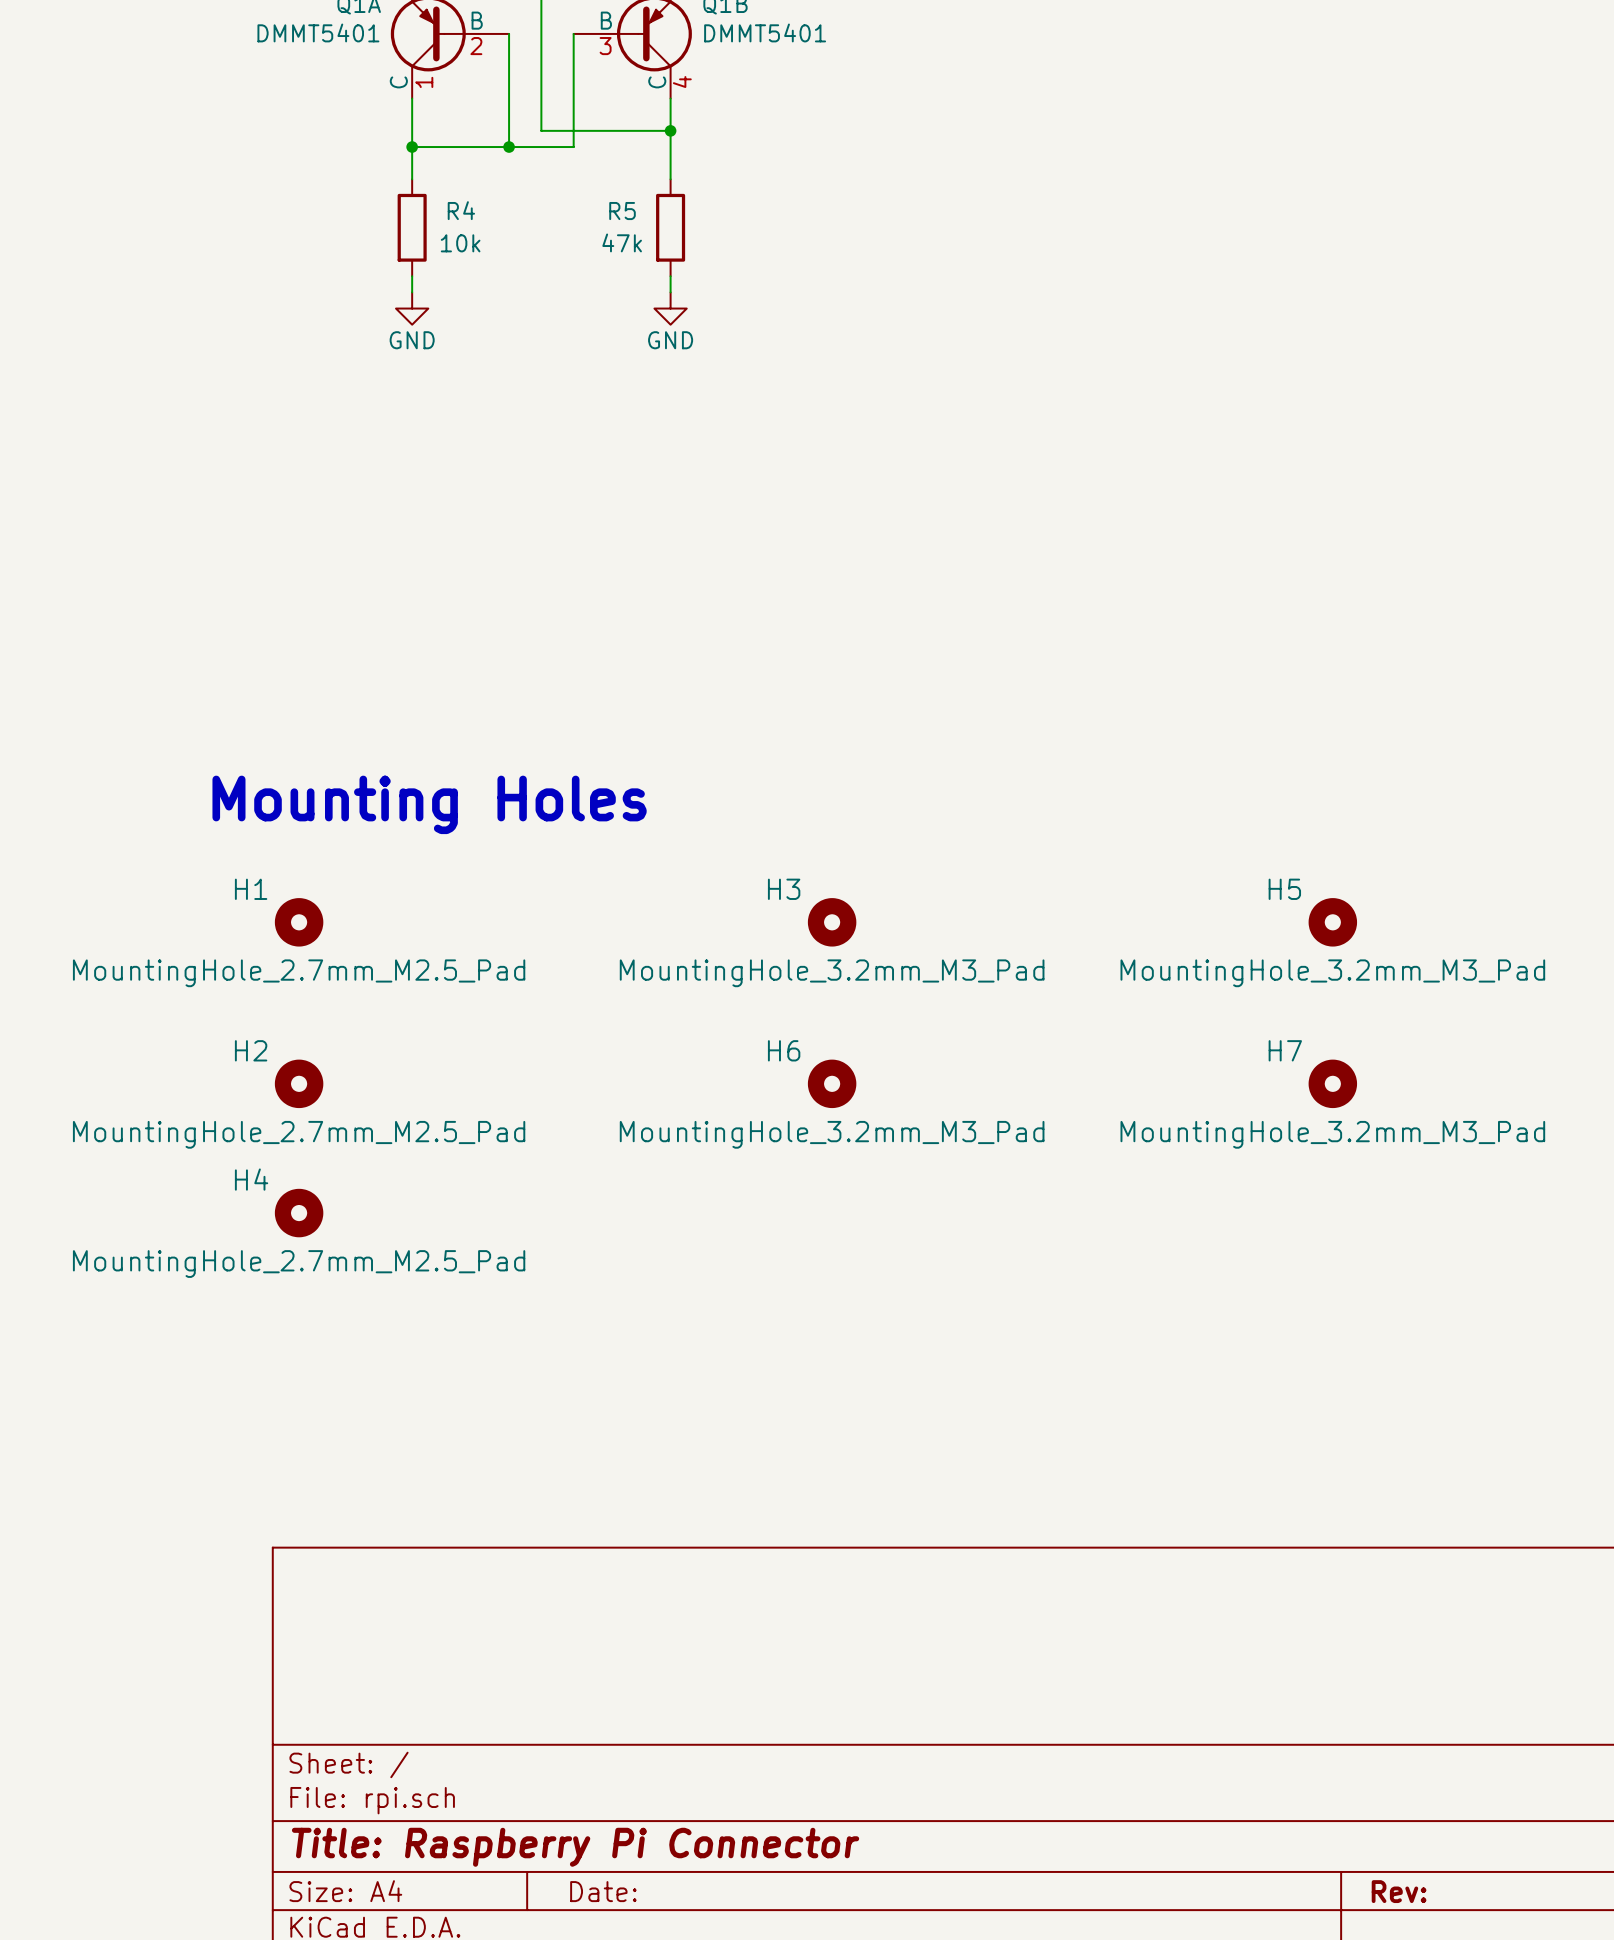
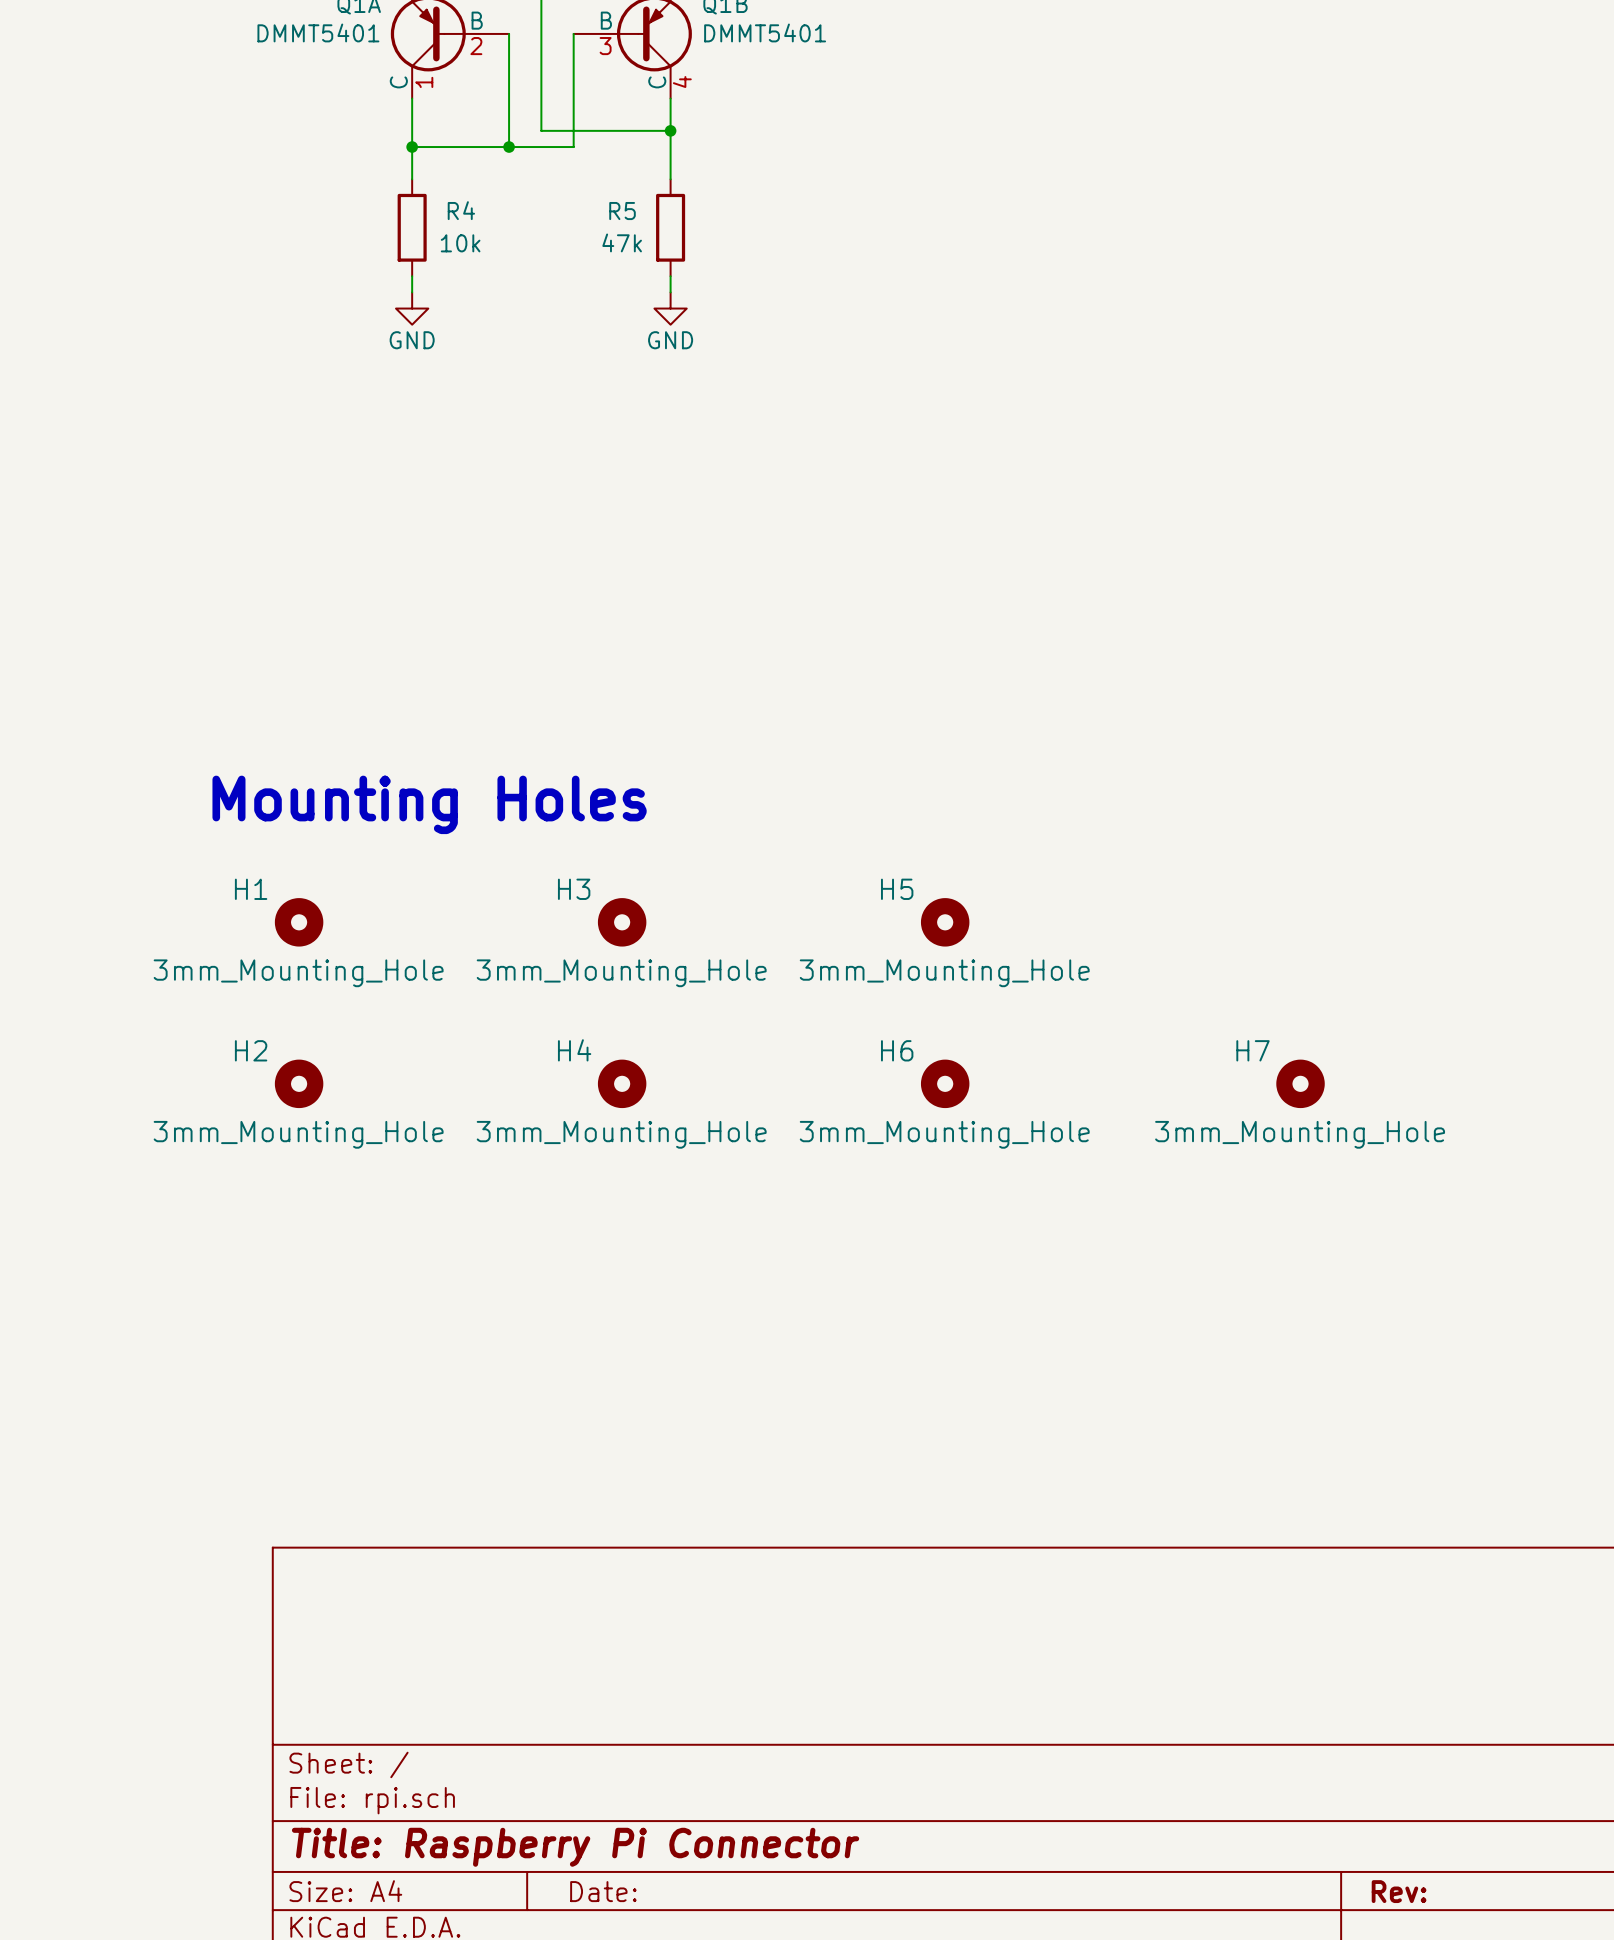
H3 position: (832, 922) -> (622, 922)
H5 position: (1332, 922) -> (945, 922)
H1 value: MountingHole_2.7mm_M2.5_Pad (299, 973) -> 3mm_Mounting_Hole (298, 973)
H3 value: MountingHole_3.2mm_M3_Pad (832, 973) -> 3mm_Mounting_Hole (621, 973)
H5 value: MountingHole_3.2mm_M3_Pad (1332, 973) -> 3mm_Mounting_Hole (944, 973)
H6 position: (832, 1083) -> (945, 1083)
H7 position: (1332, 1083) -> (1300, 1083)
H2 value: MountingHole_2.7mm_M2.5_Pad (299, 1134) -> 3mm_Mounting_Hole (298, 1134)
H6 value: MountingHole_3.2mm_M3_Pad (832, 1134) -> 3mm_Mounting_Hole (944, 1134)
H7 value: MountingHole_3.2mm_M3_Pad (1332, 1134) -> 3mm_Mounting_Hole (1300, 1134)
H4 position: (299, 1213) -> (622, 1083)
H4 value: MountingHole_2.7mm_M2.5_Pad (299, 1264) -> 3mm_Mounting_Hole (621, 1134)

